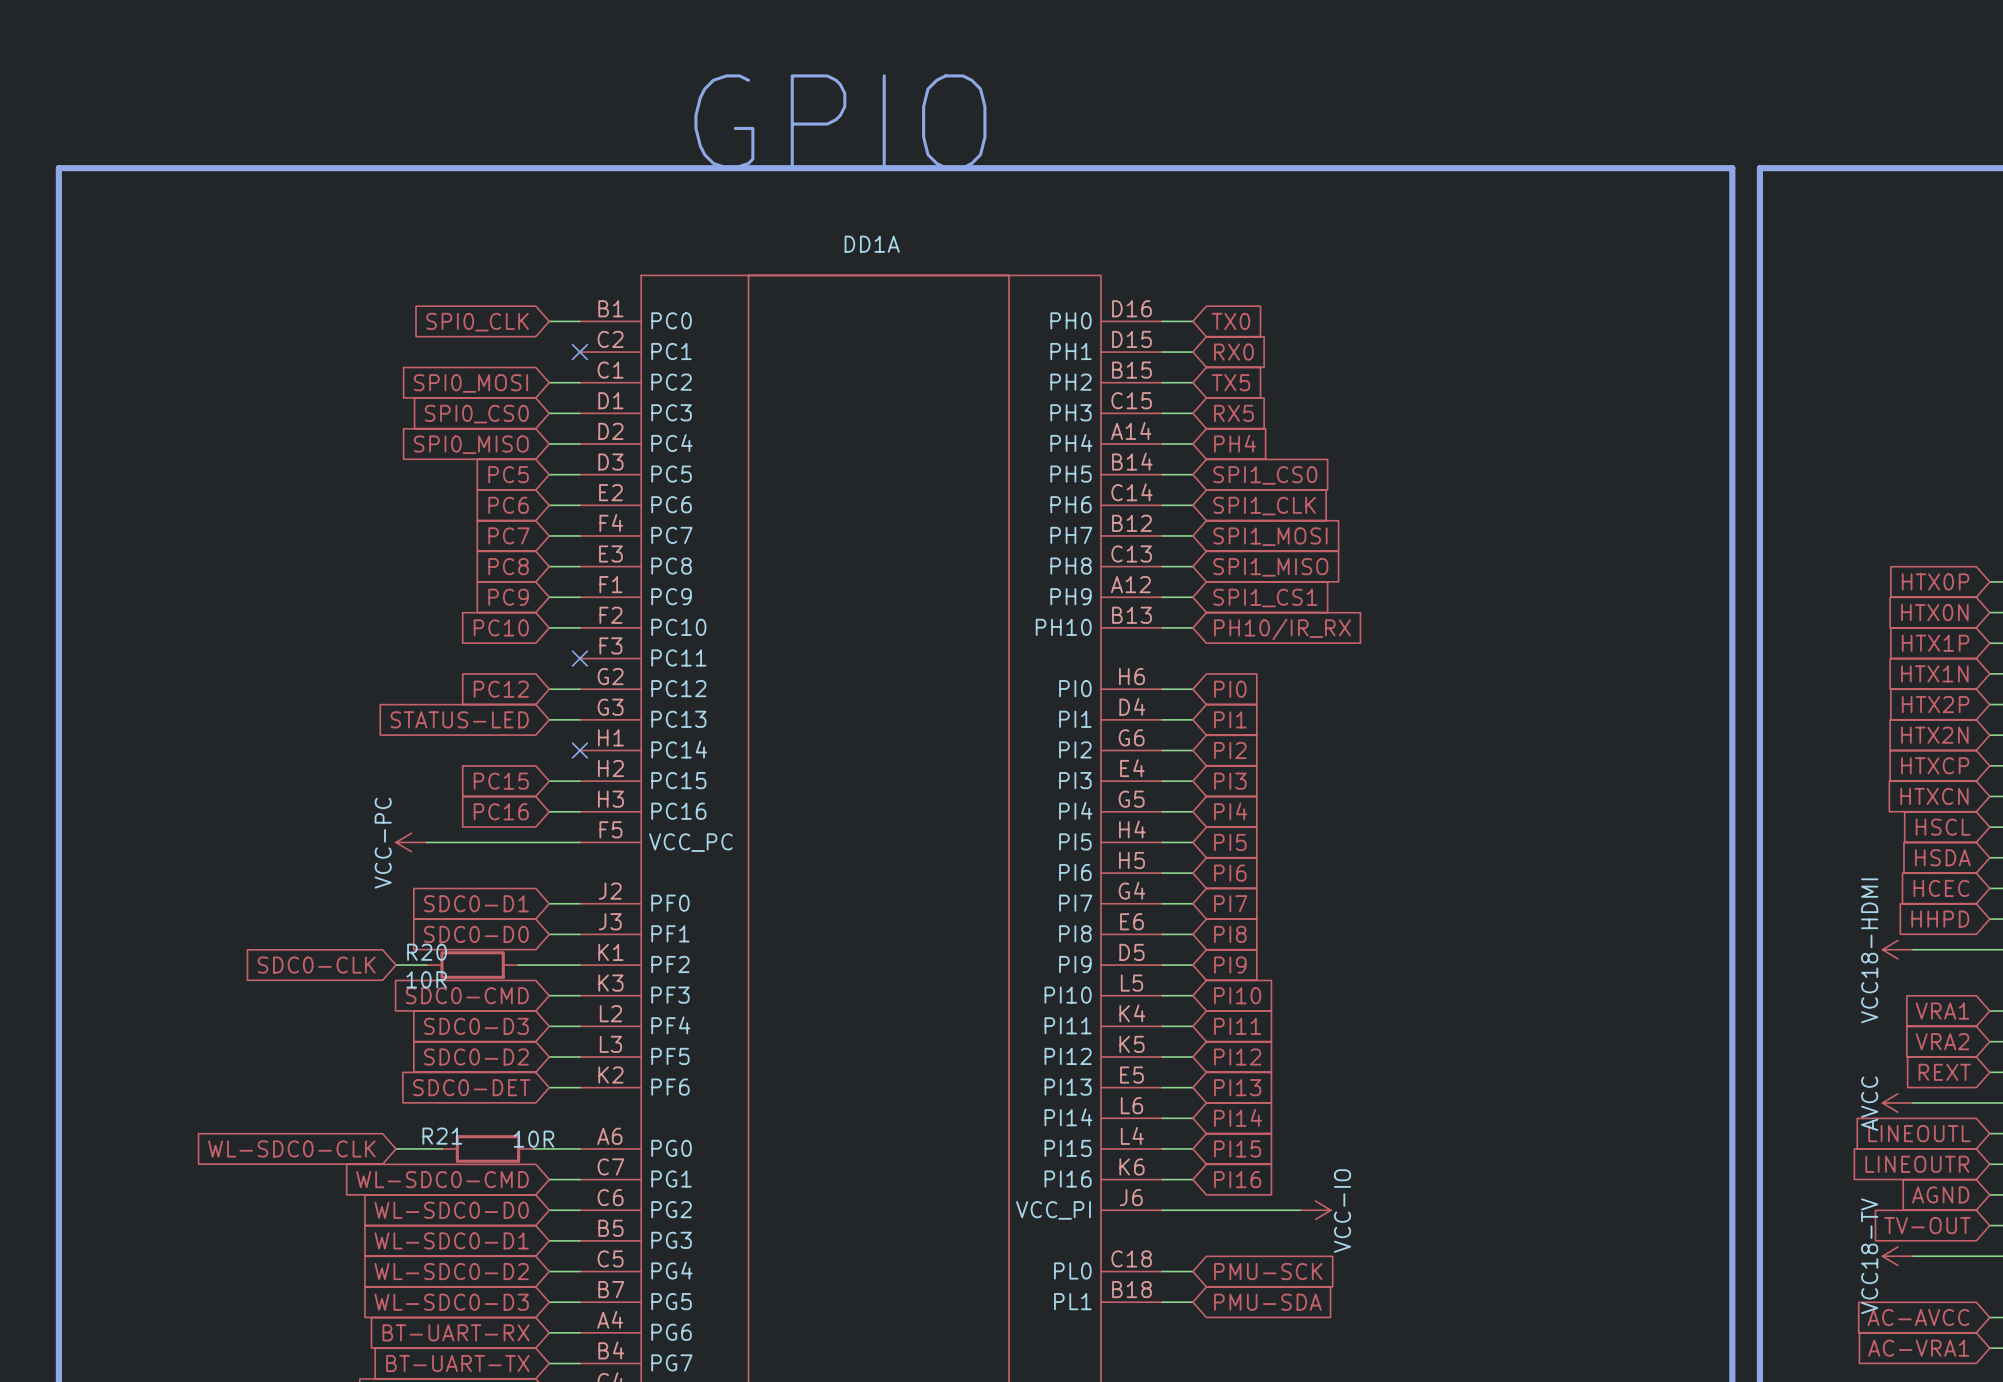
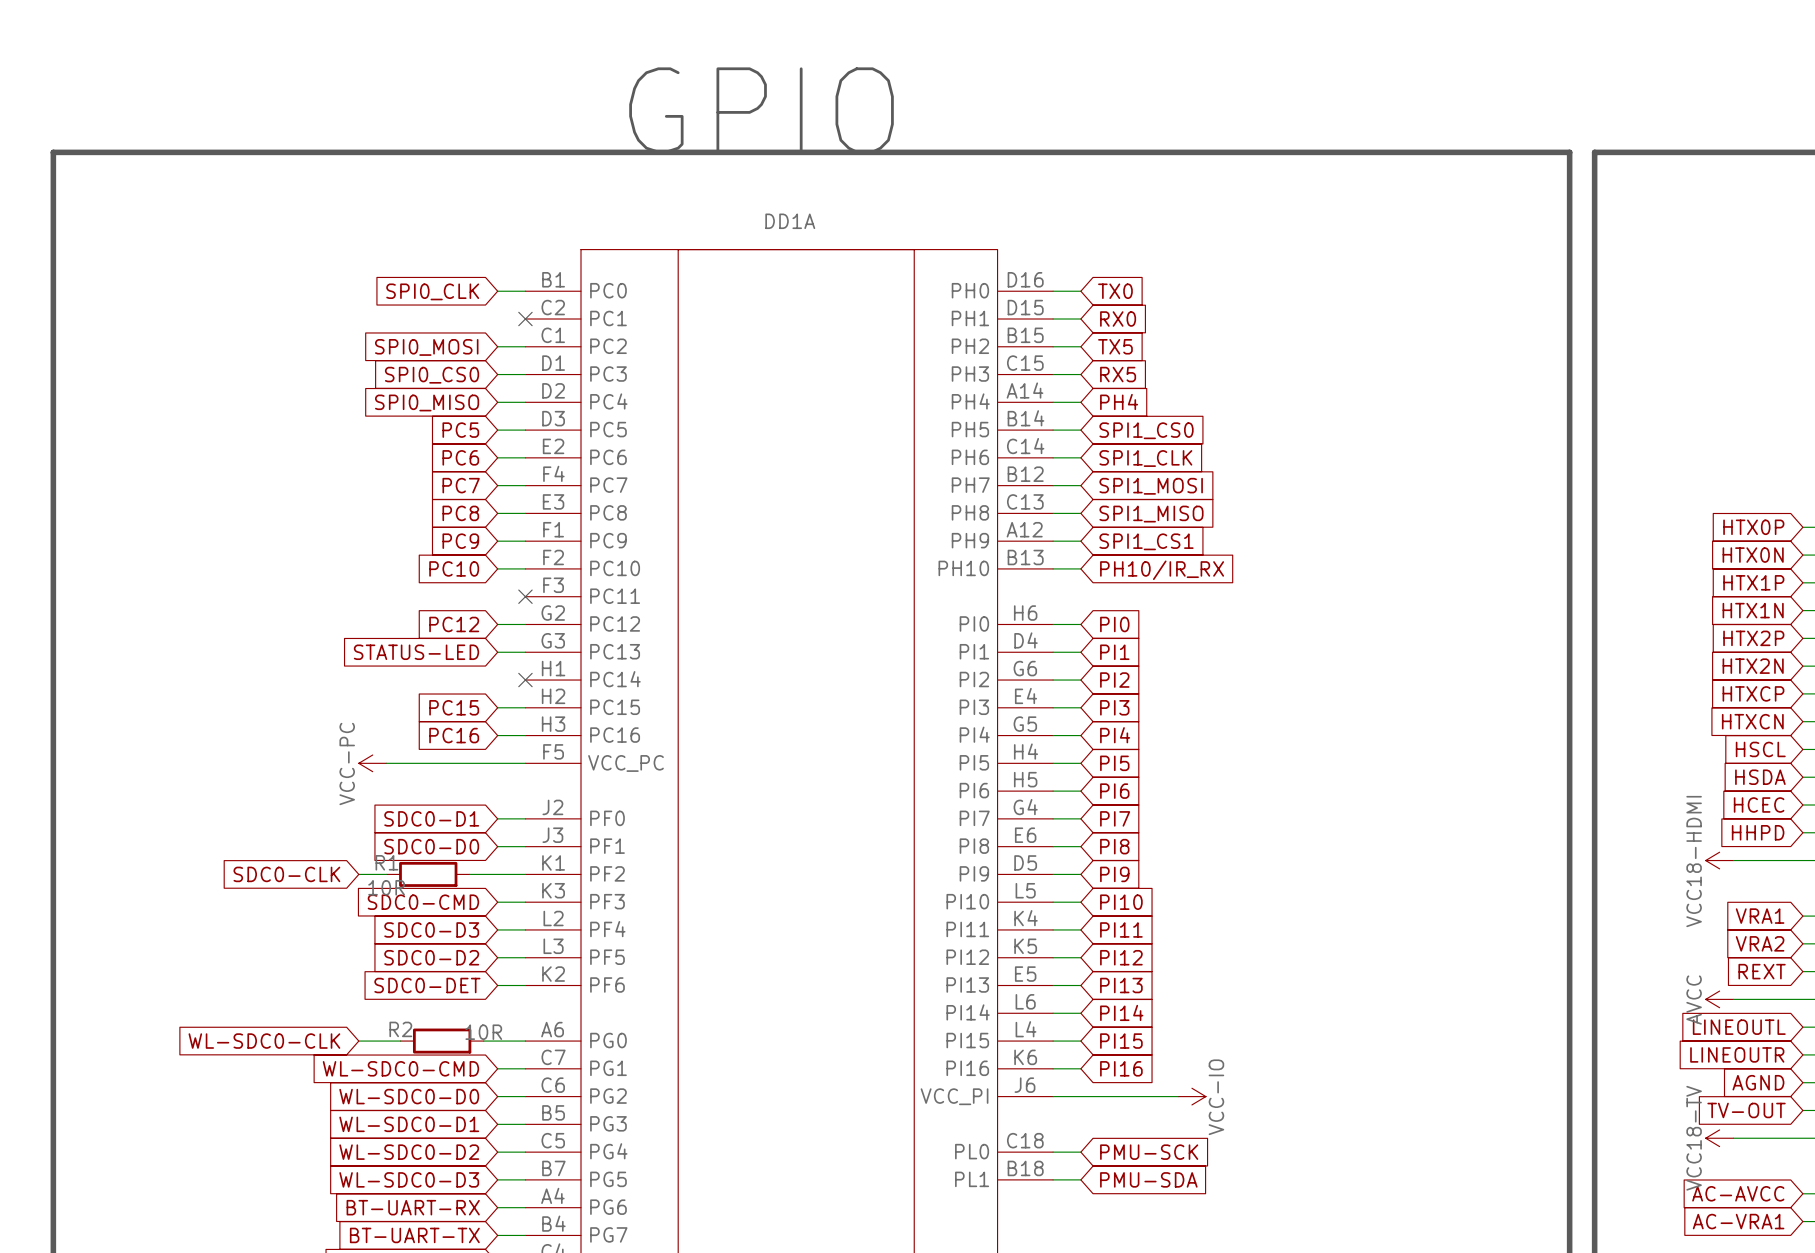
R20 name: R20 (427, 952) -> R1 (386, 862)
R21 name: R21 (442, 1136) -> R2 (400, 1029)

